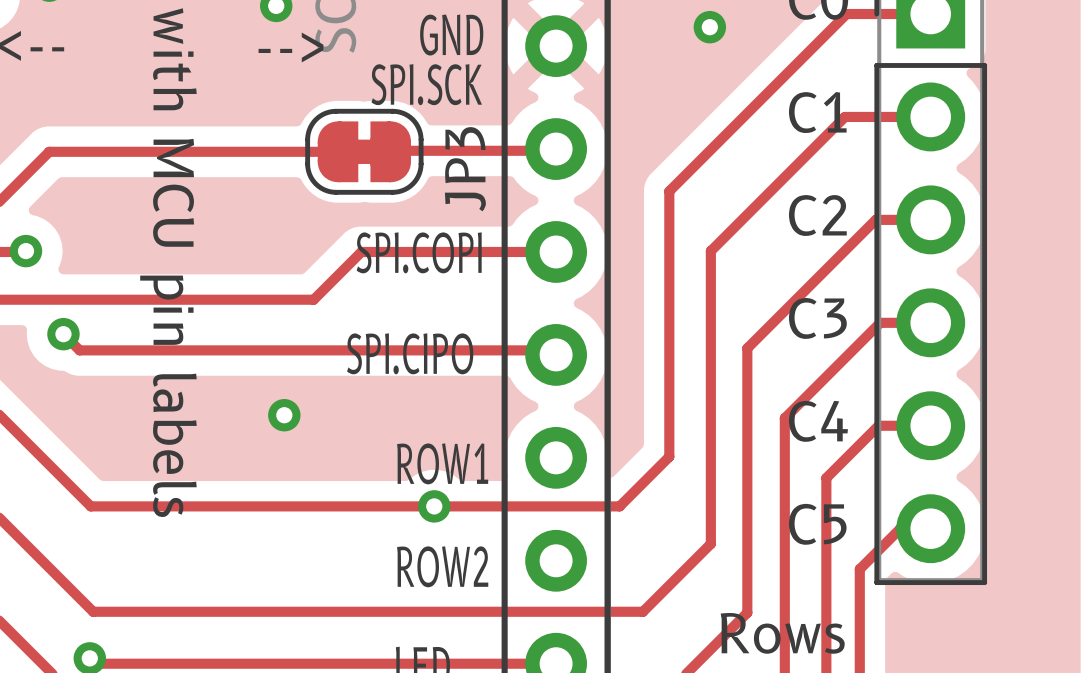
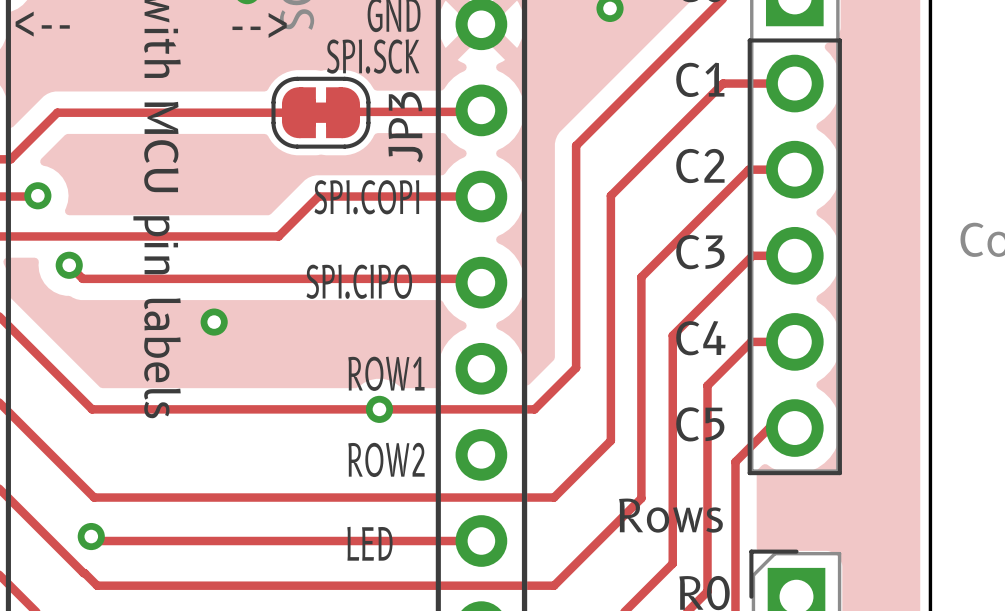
via position: (284, 415) -> (214, 322)

